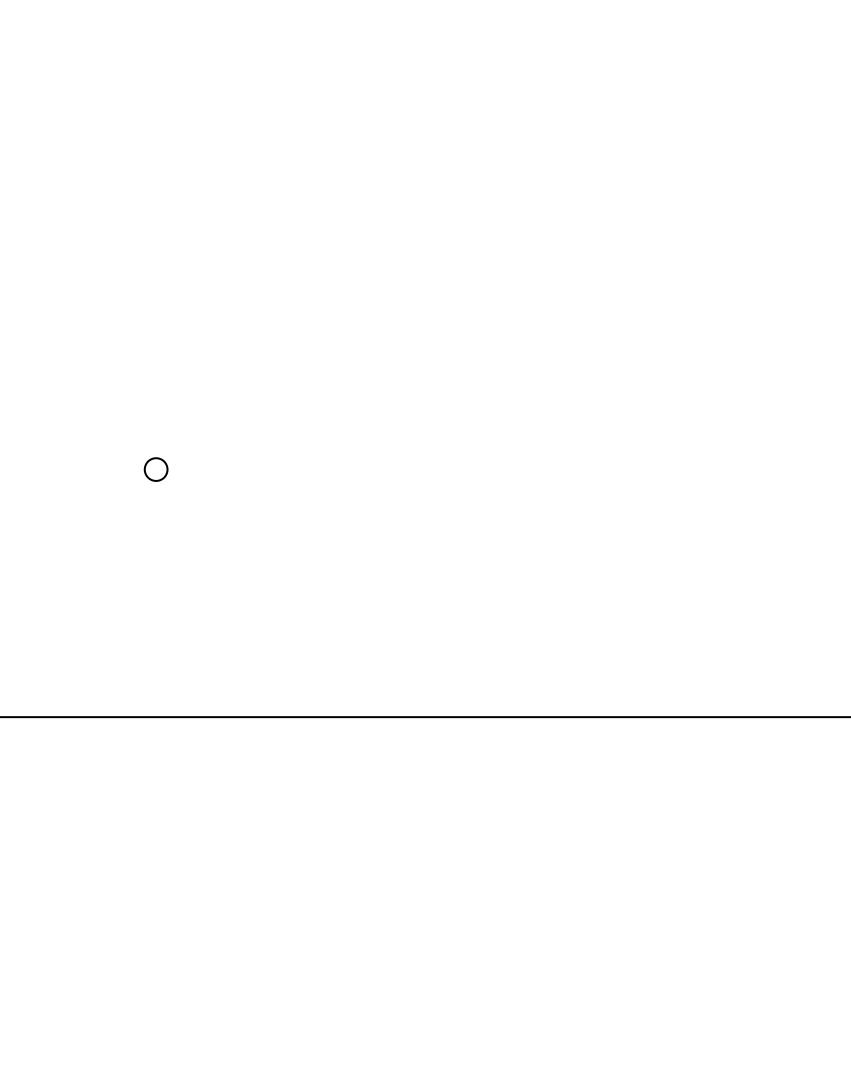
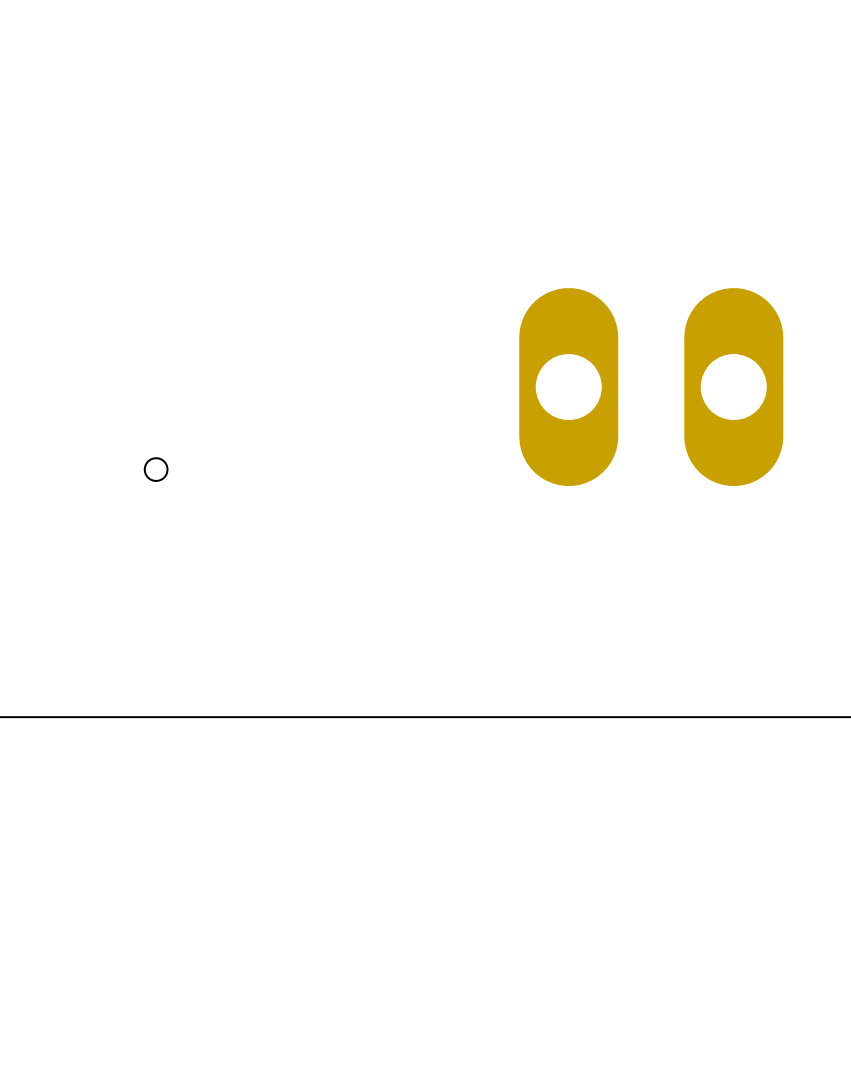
part: none -> (651, 387)

